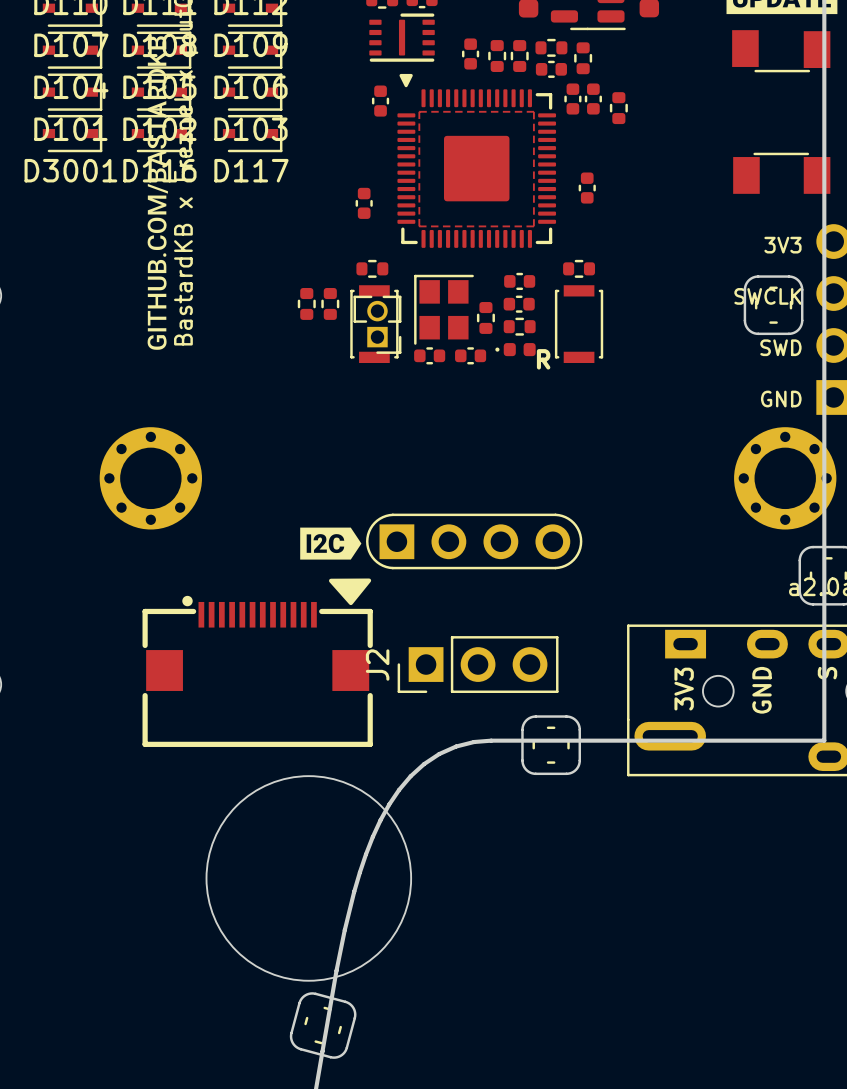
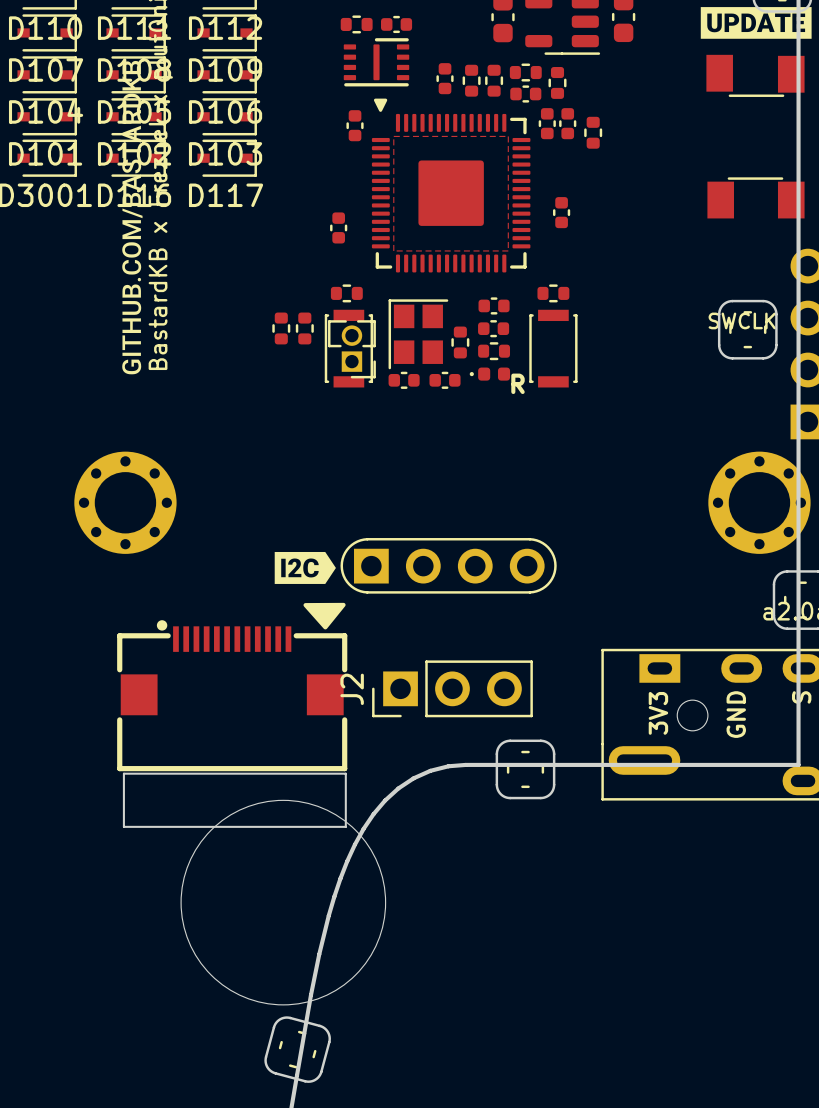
text: 3V3 (782, 245) -> none
text: SWD (780, 347) -> none
text: GND (781, 399) -> none
board edge: none -> (123, 773) (345, 773) (345, 826) (123, 826) (123, 773)

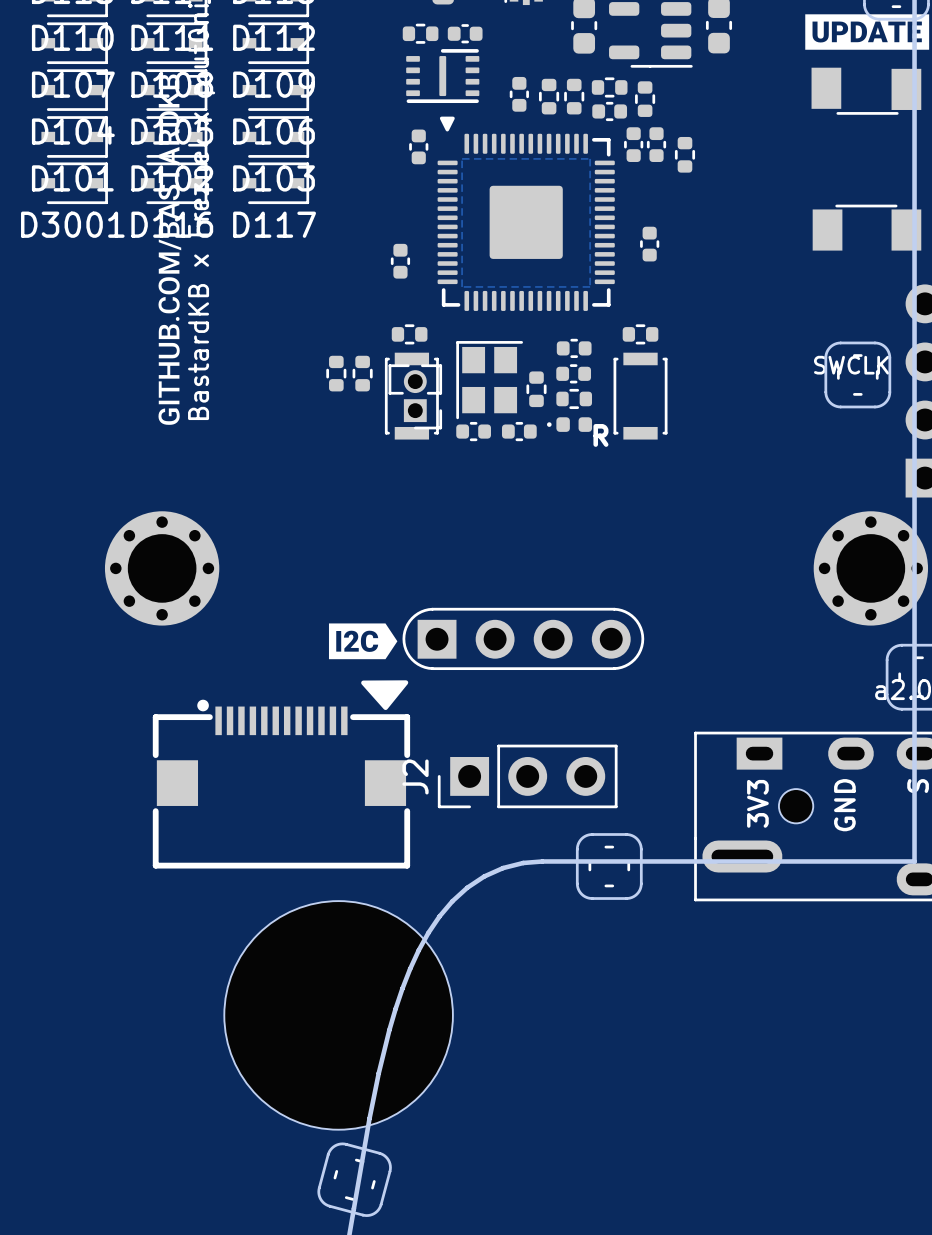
board edge: (123, 773) (345, 773) (345, 826) (123, 826) (123, 773) -> none

